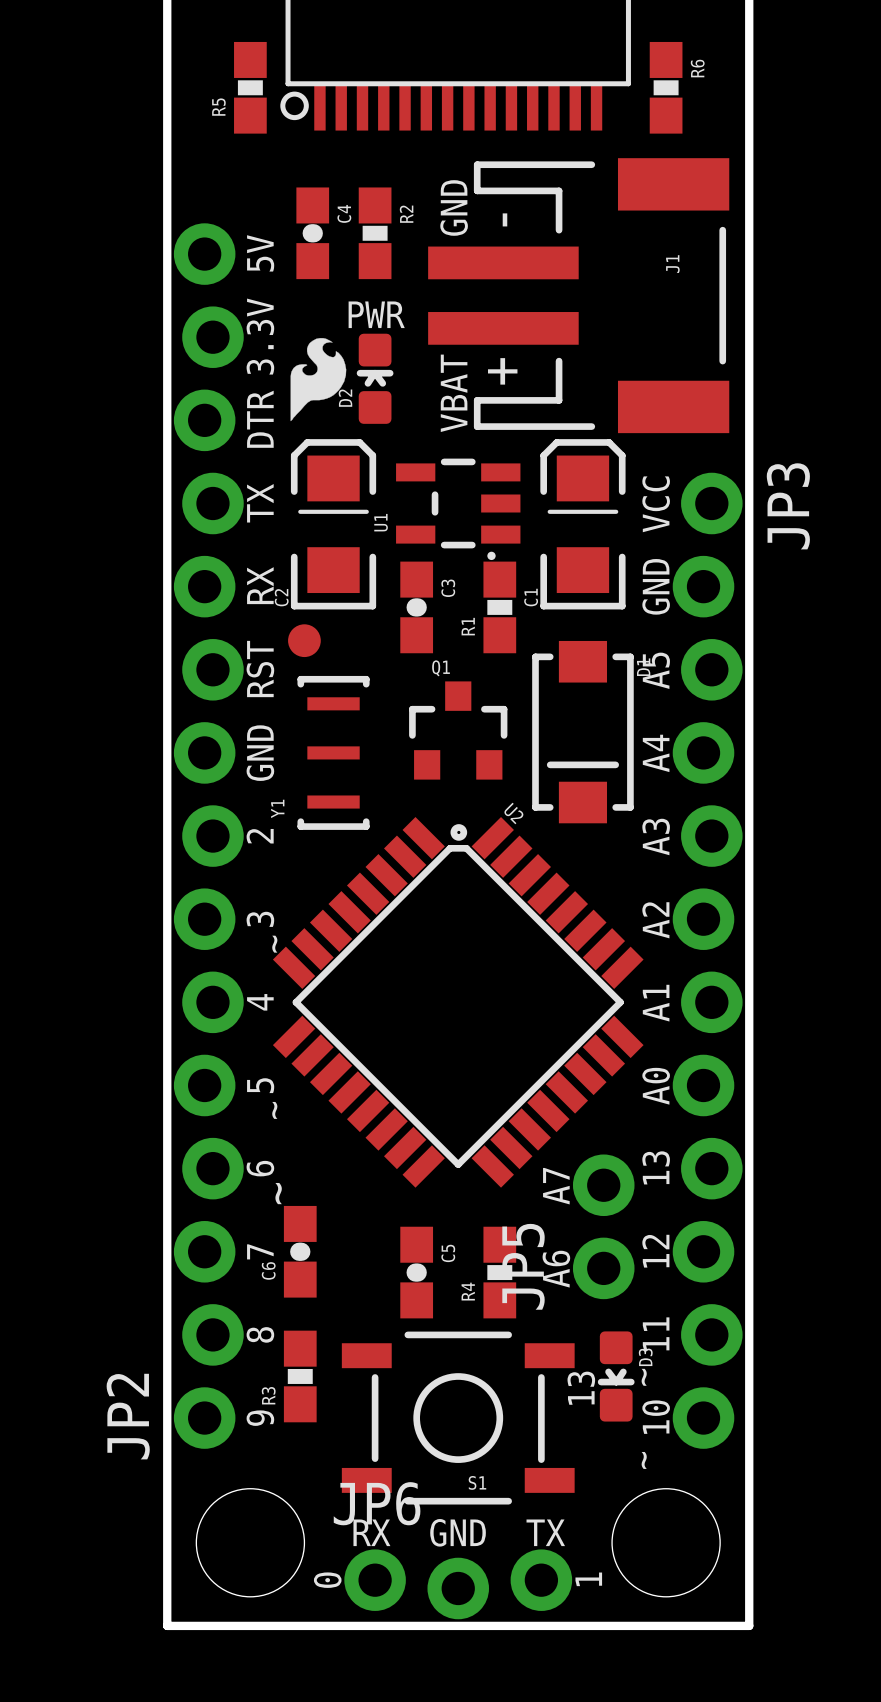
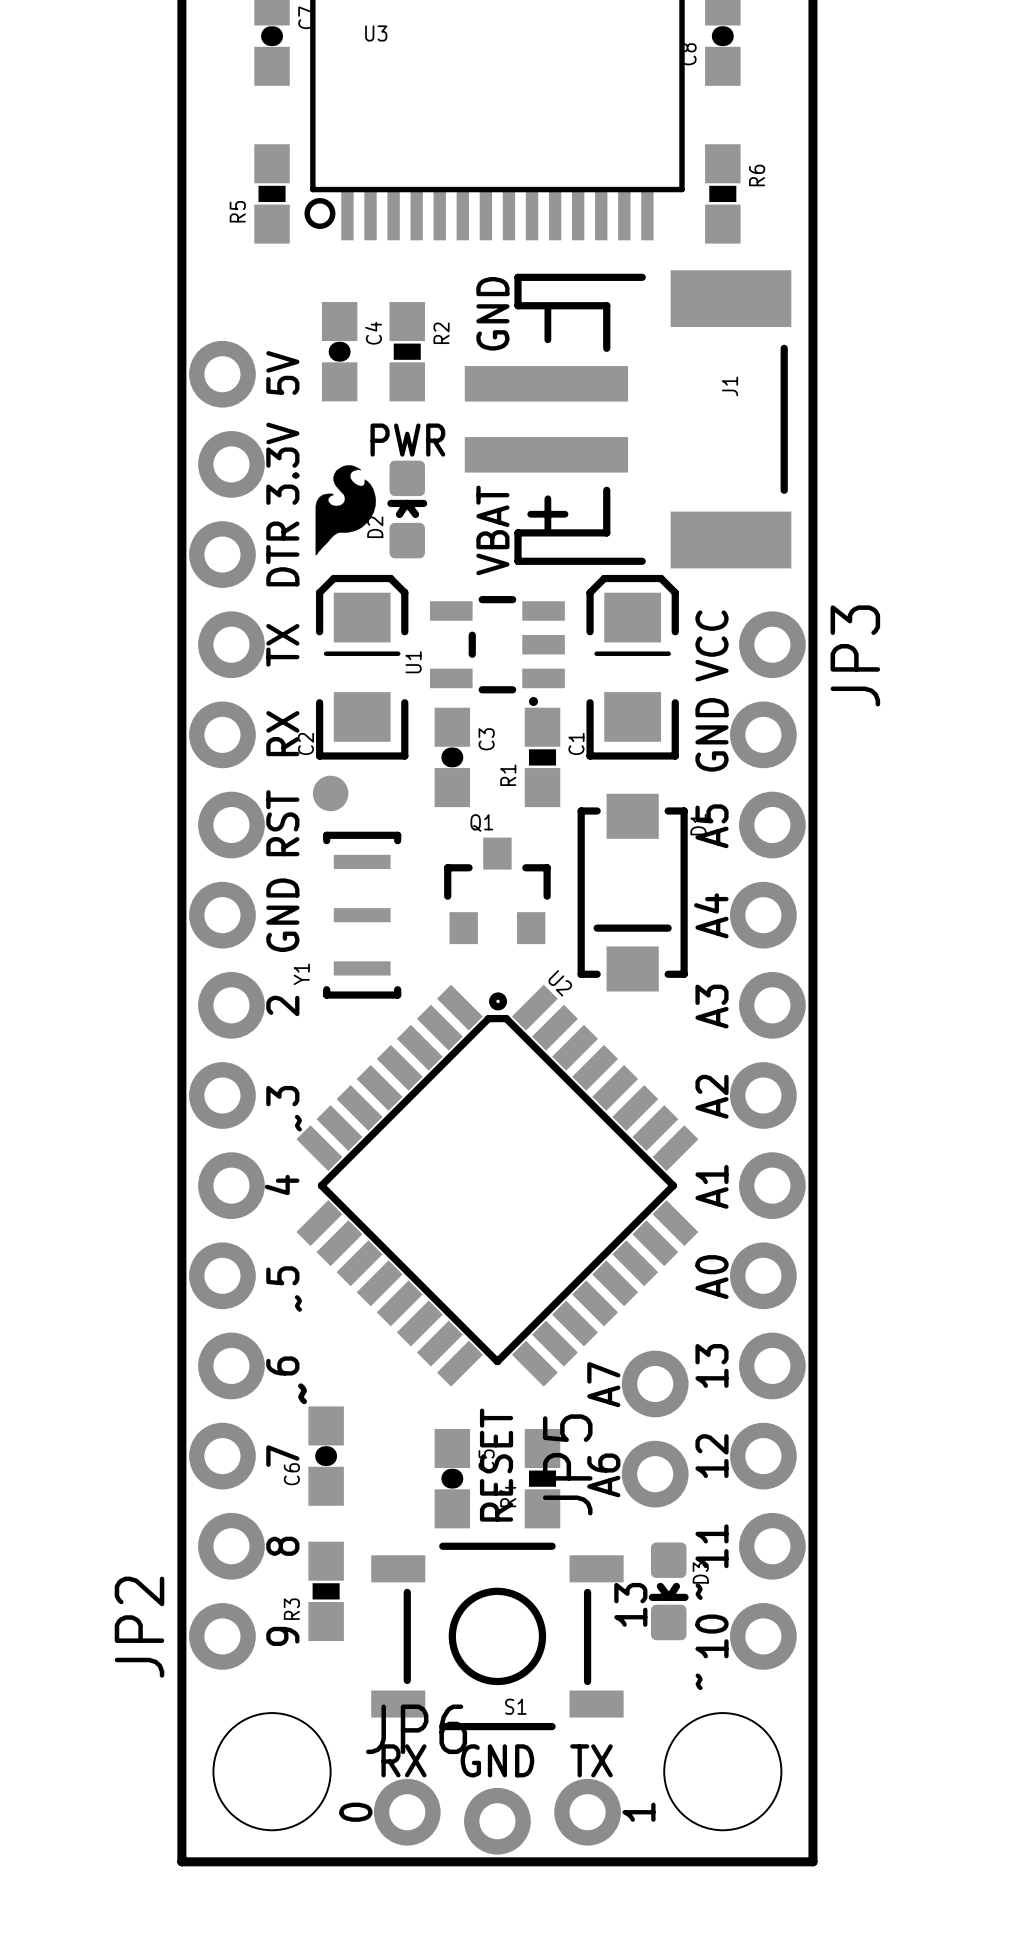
text: none -> RESET (496, 1465)

